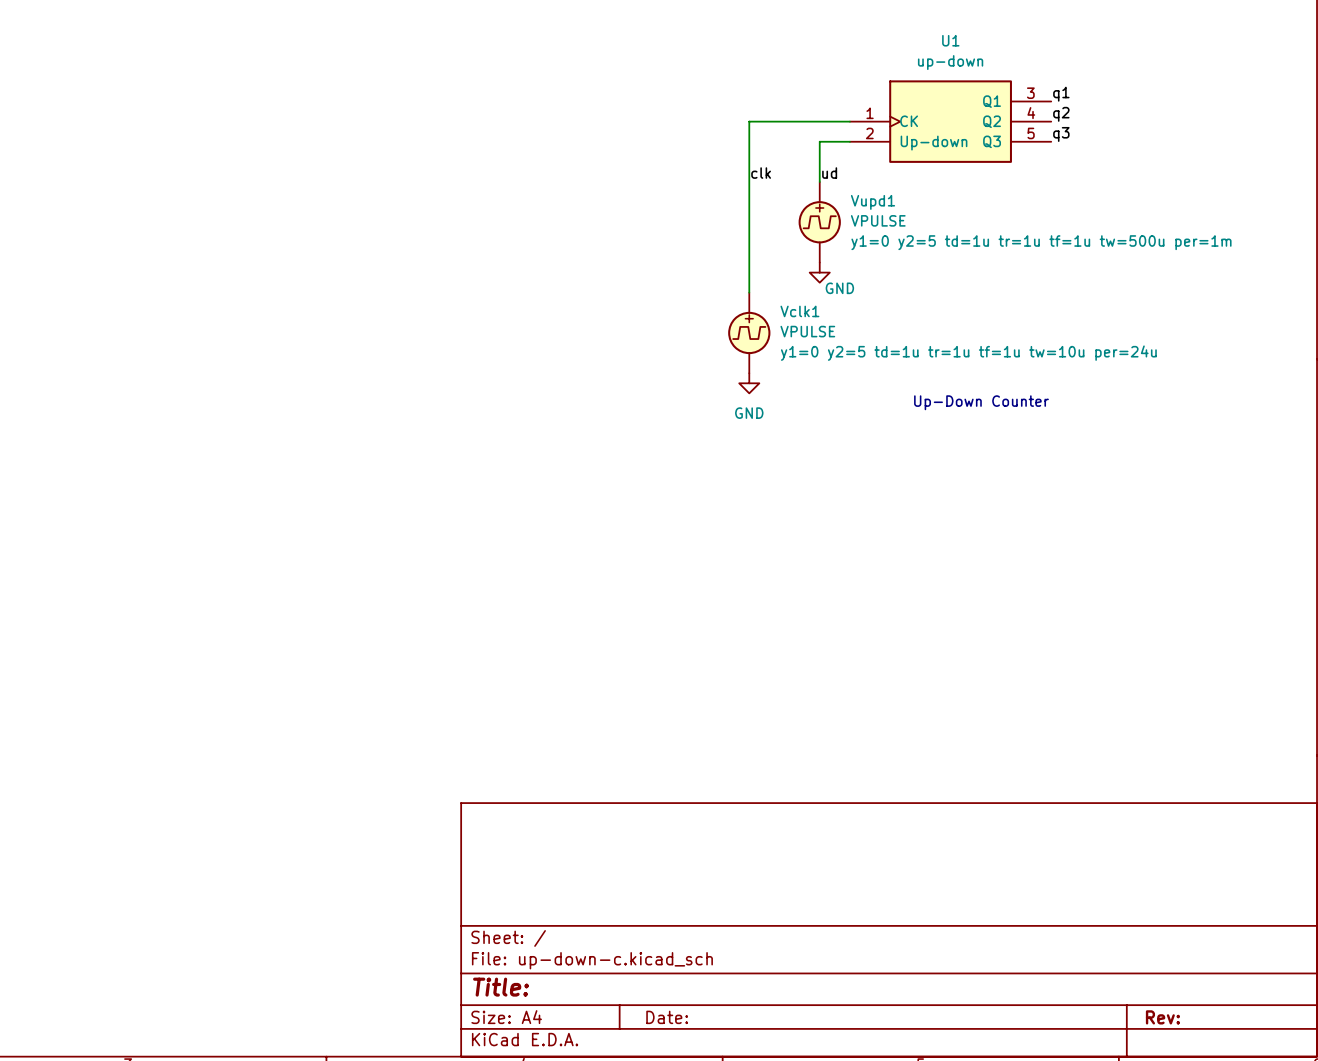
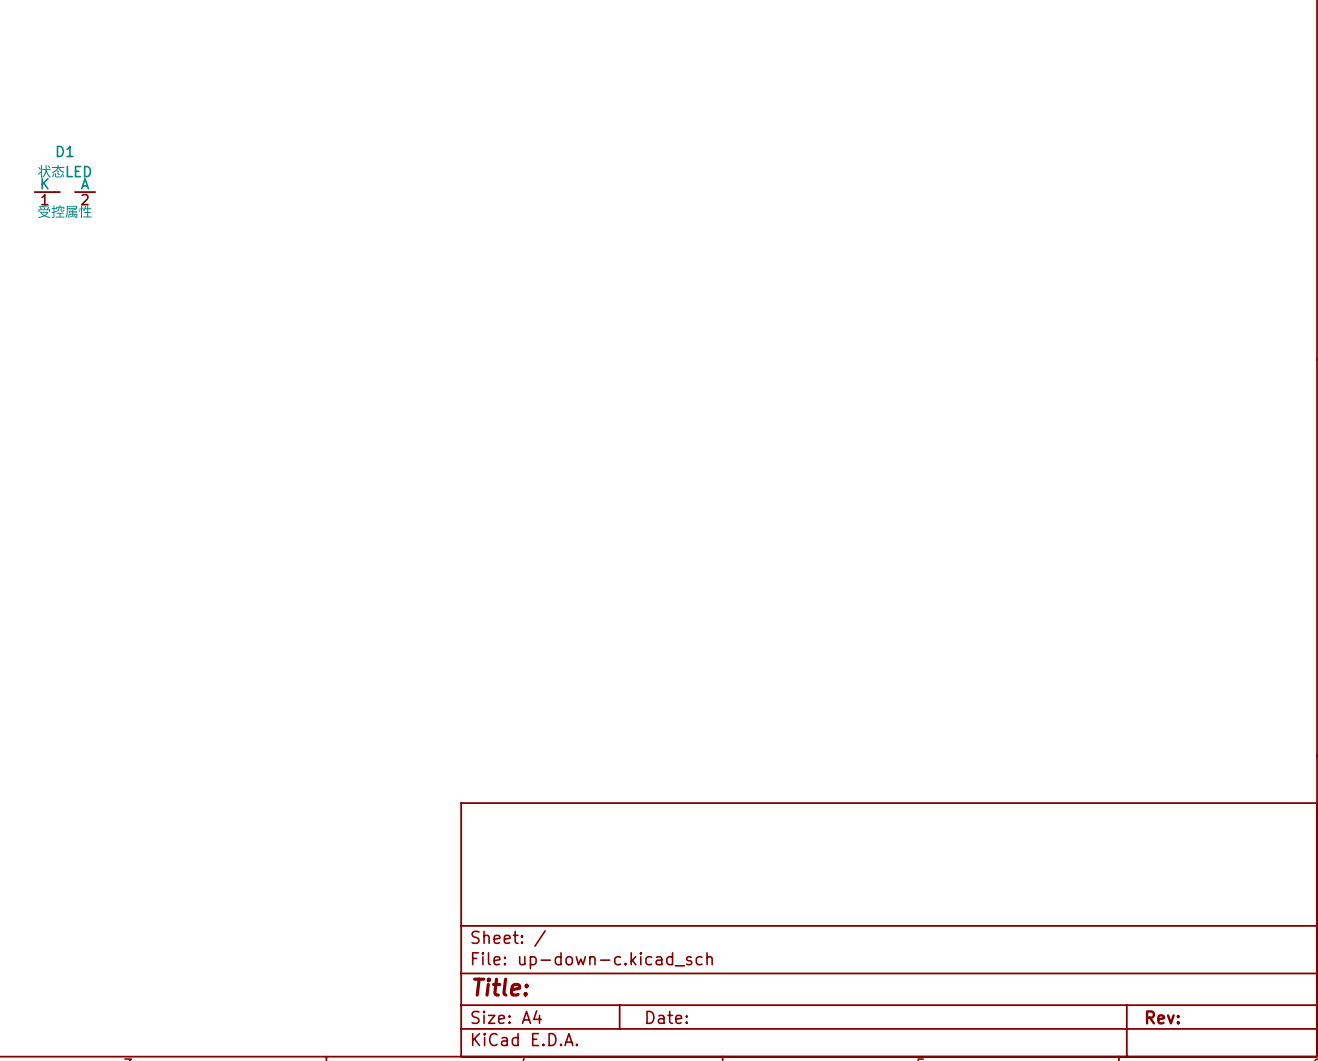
label: q1 (1061, 94) -> none
label: q2 (1061, 114) -> none
wire: (849, 121) (749, 121) (749, 292) -> none
U1: up-down (950, 121) -> none
label: q3 (1061, 134) -> none
wire: (849, 141) (819, 141) (819, 182) -> none
label: clk (761, 173) -> none
label: ud (829, 173) -> none
D1: none -> 状态LED (64, 192)
Vupd1: VPULSE (819, 222) -> none
power symbol: GND (819, 272) -> none
Vclk1: VPULSE (749, 332) -> none
power symbol: GND (749, 383) -> none
text: Up-Down Counter (981, 402) -> none

